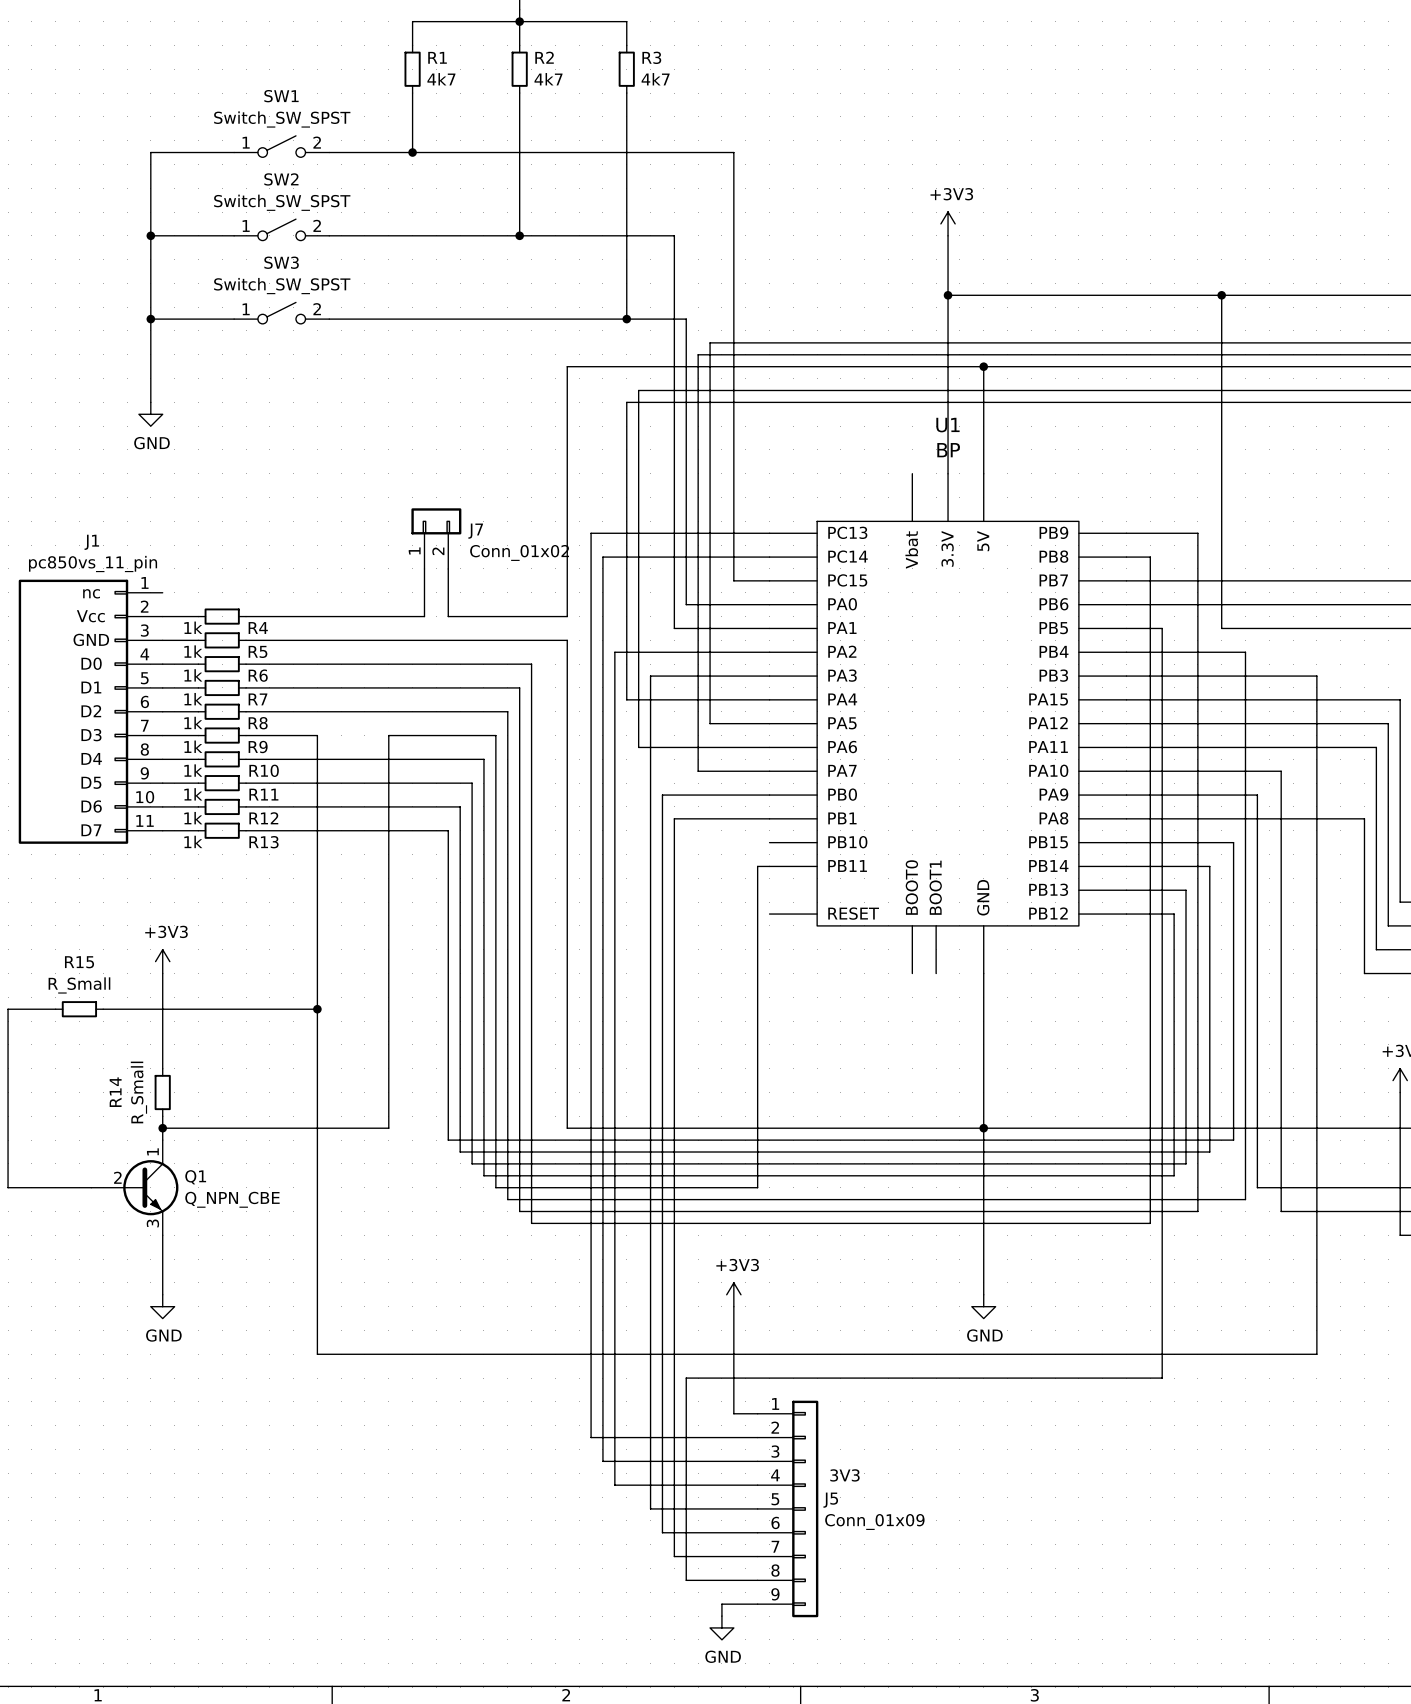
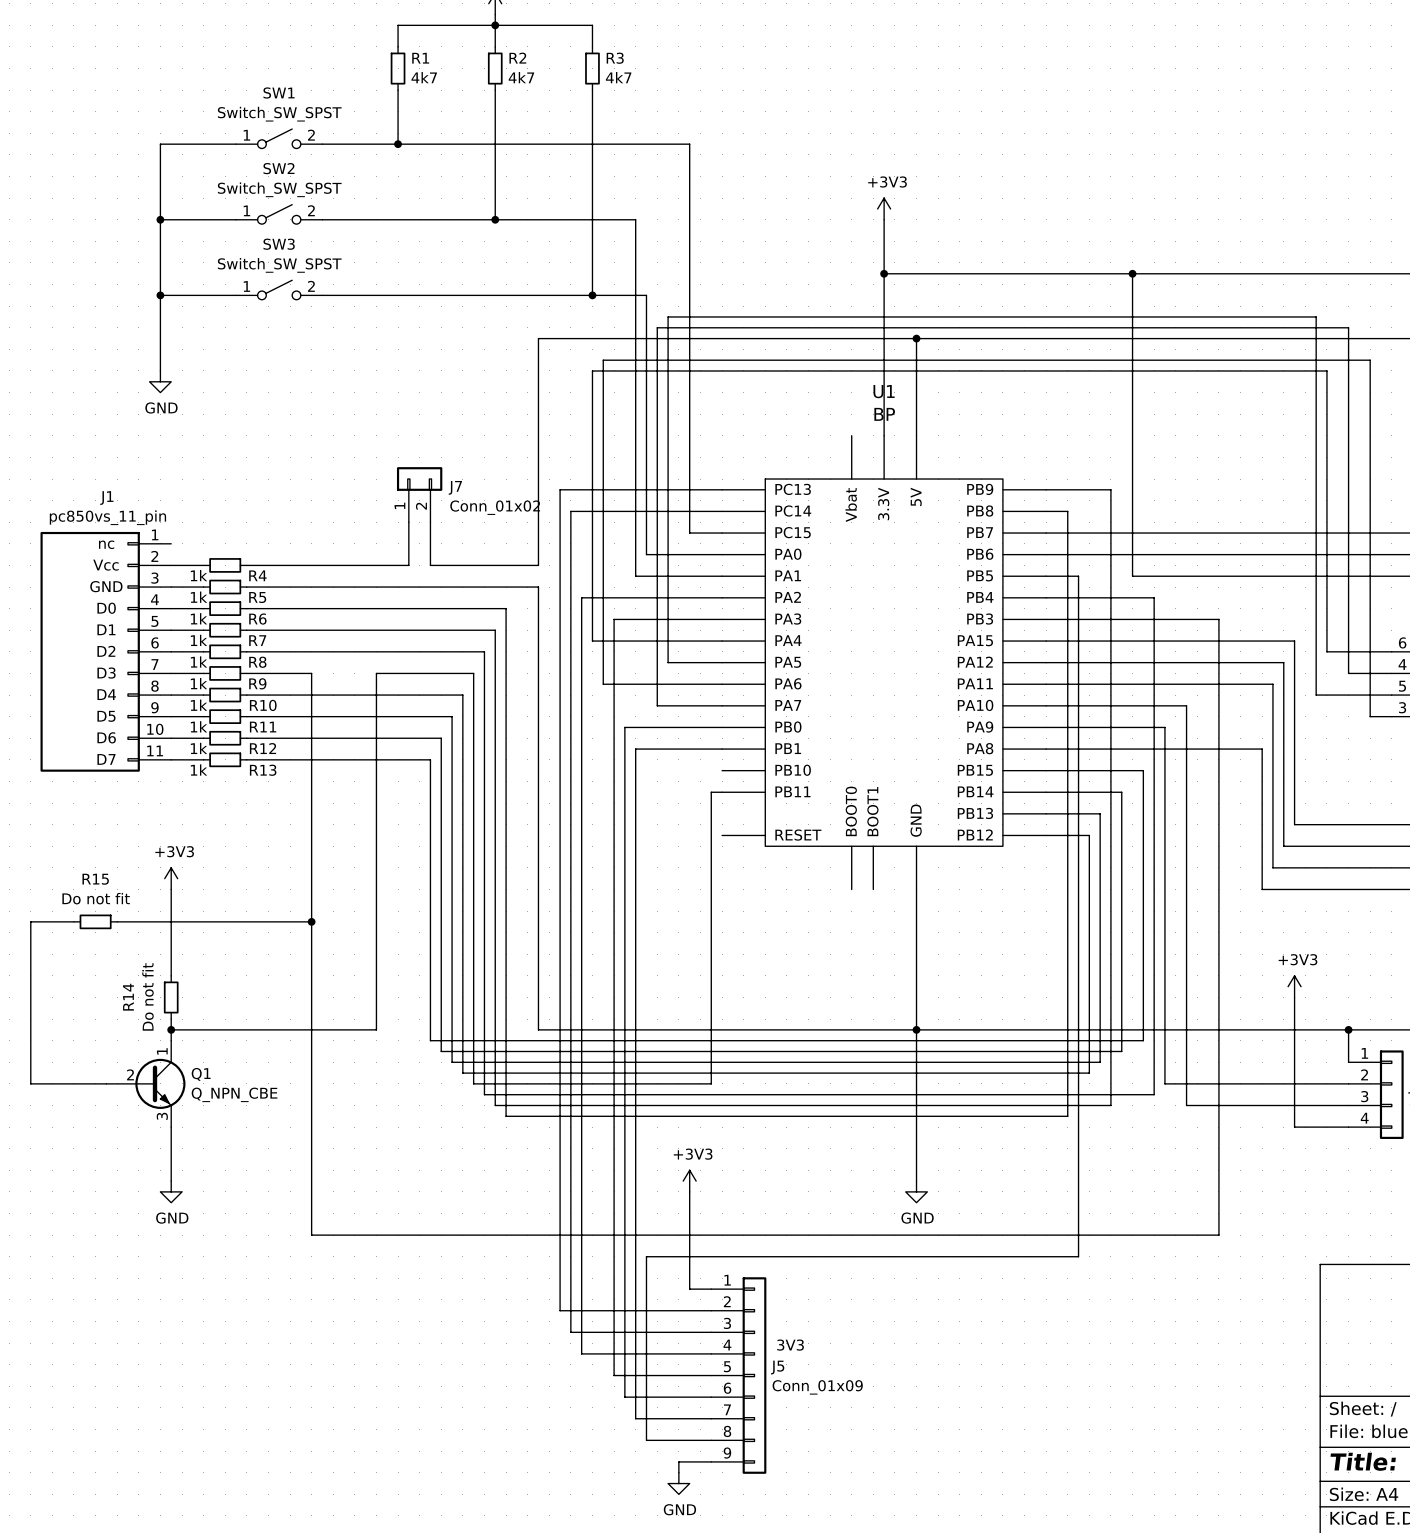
R15 value: R_Small (79, 985) -> Do not fit (96, 898)
R14 value: R_Small (138, 1092) -> Do not fit (148, 996)

